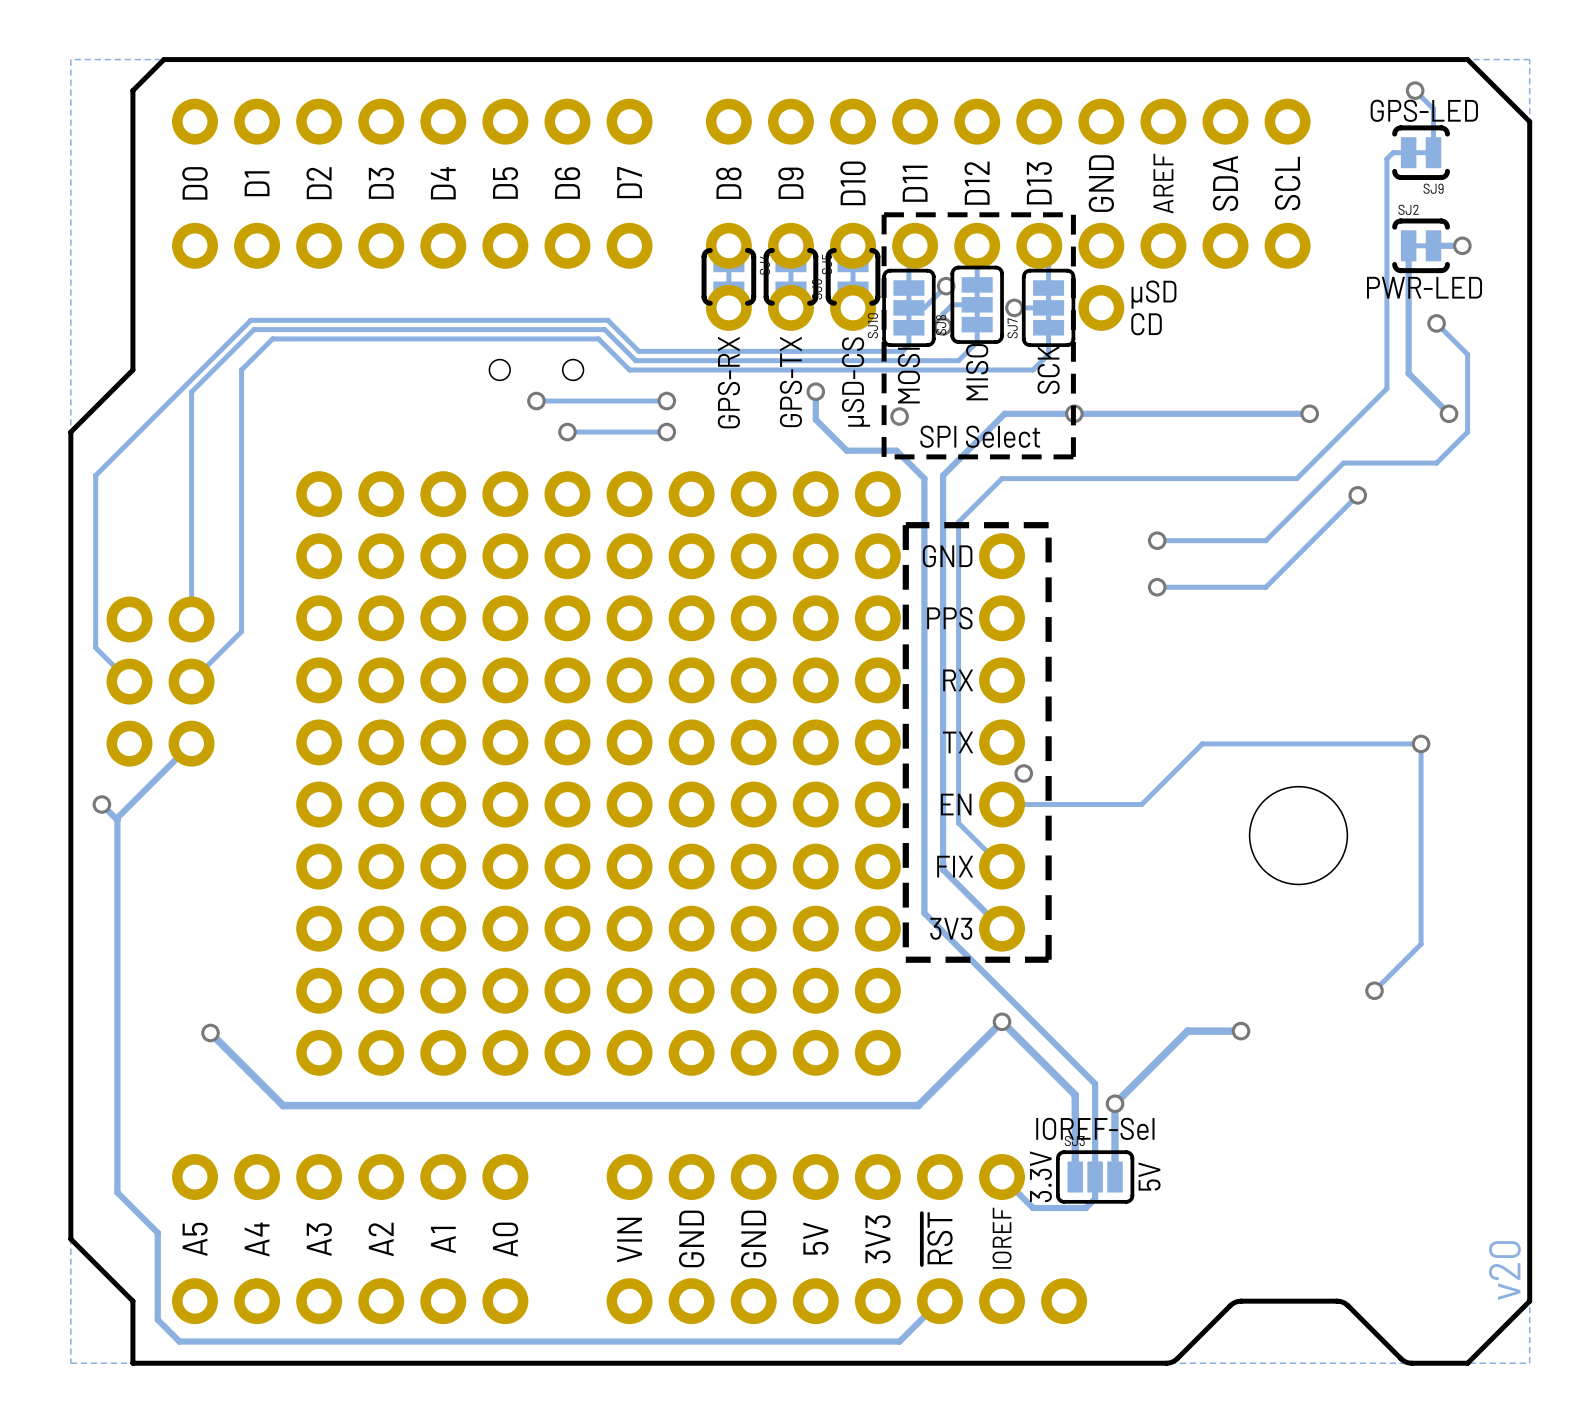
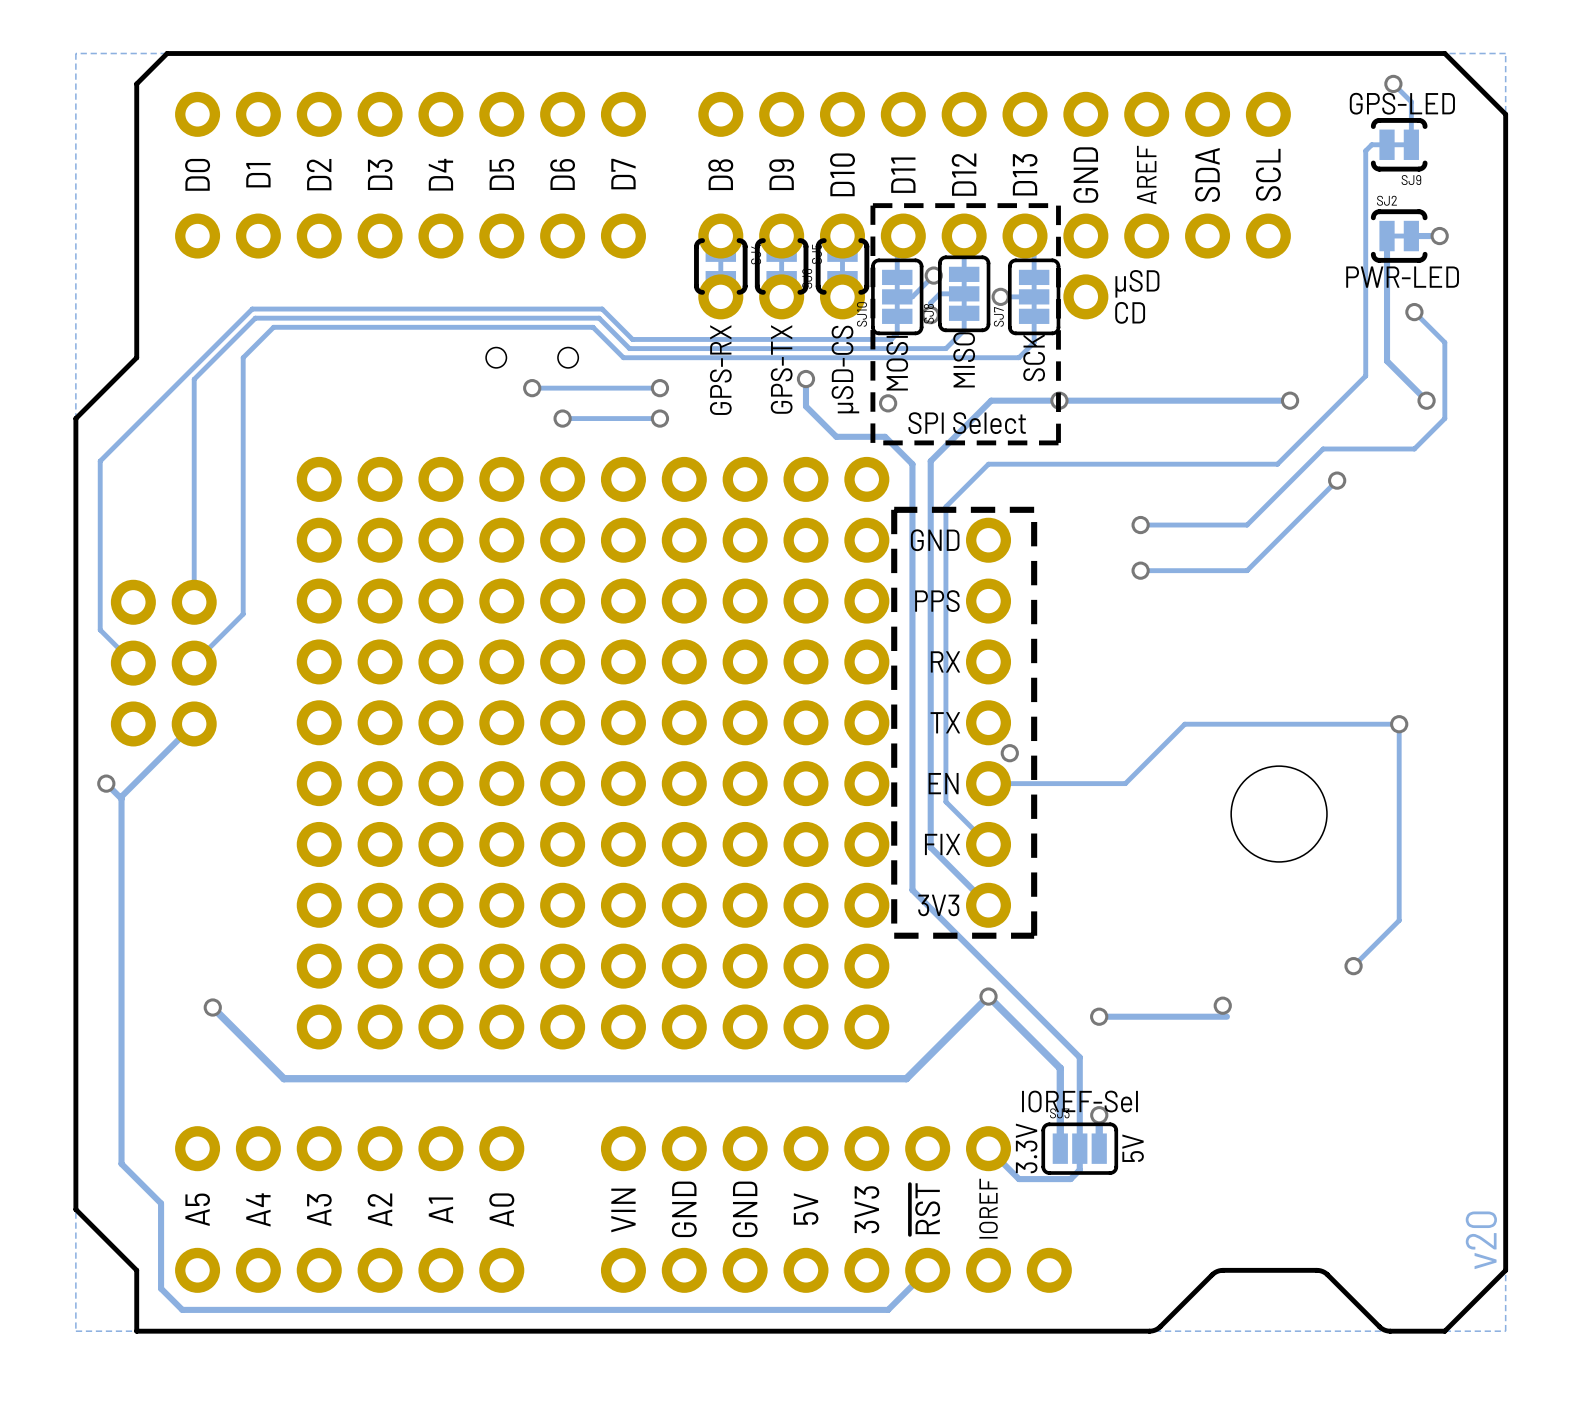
track: (1241, 1031) (1187, 1031) (1115, 1103) (1115, 1142) -> none
via: none -> (1099, 1016)
track: none -> (1226, 1016) (1099, 1016)
via: (1115, 1103) -> none
via: none -> (1099, 1115)

